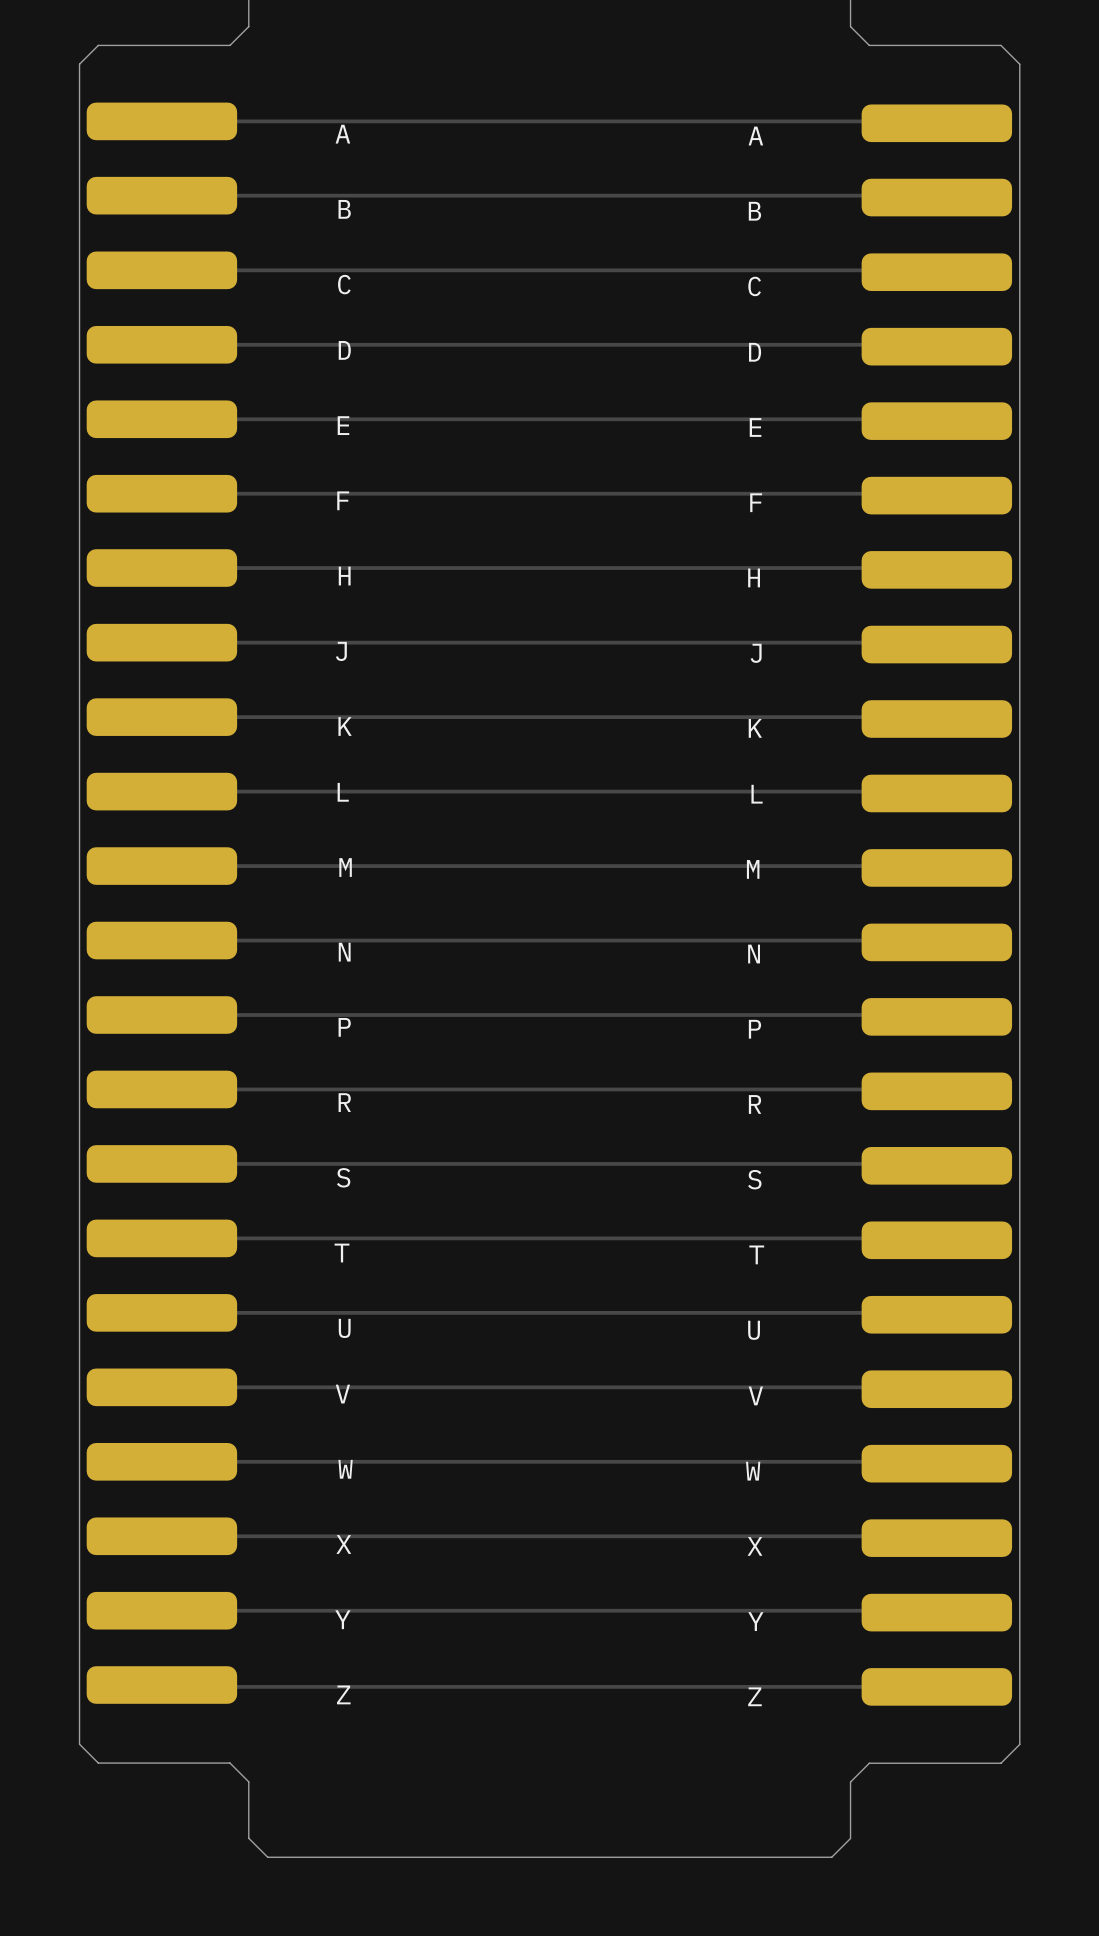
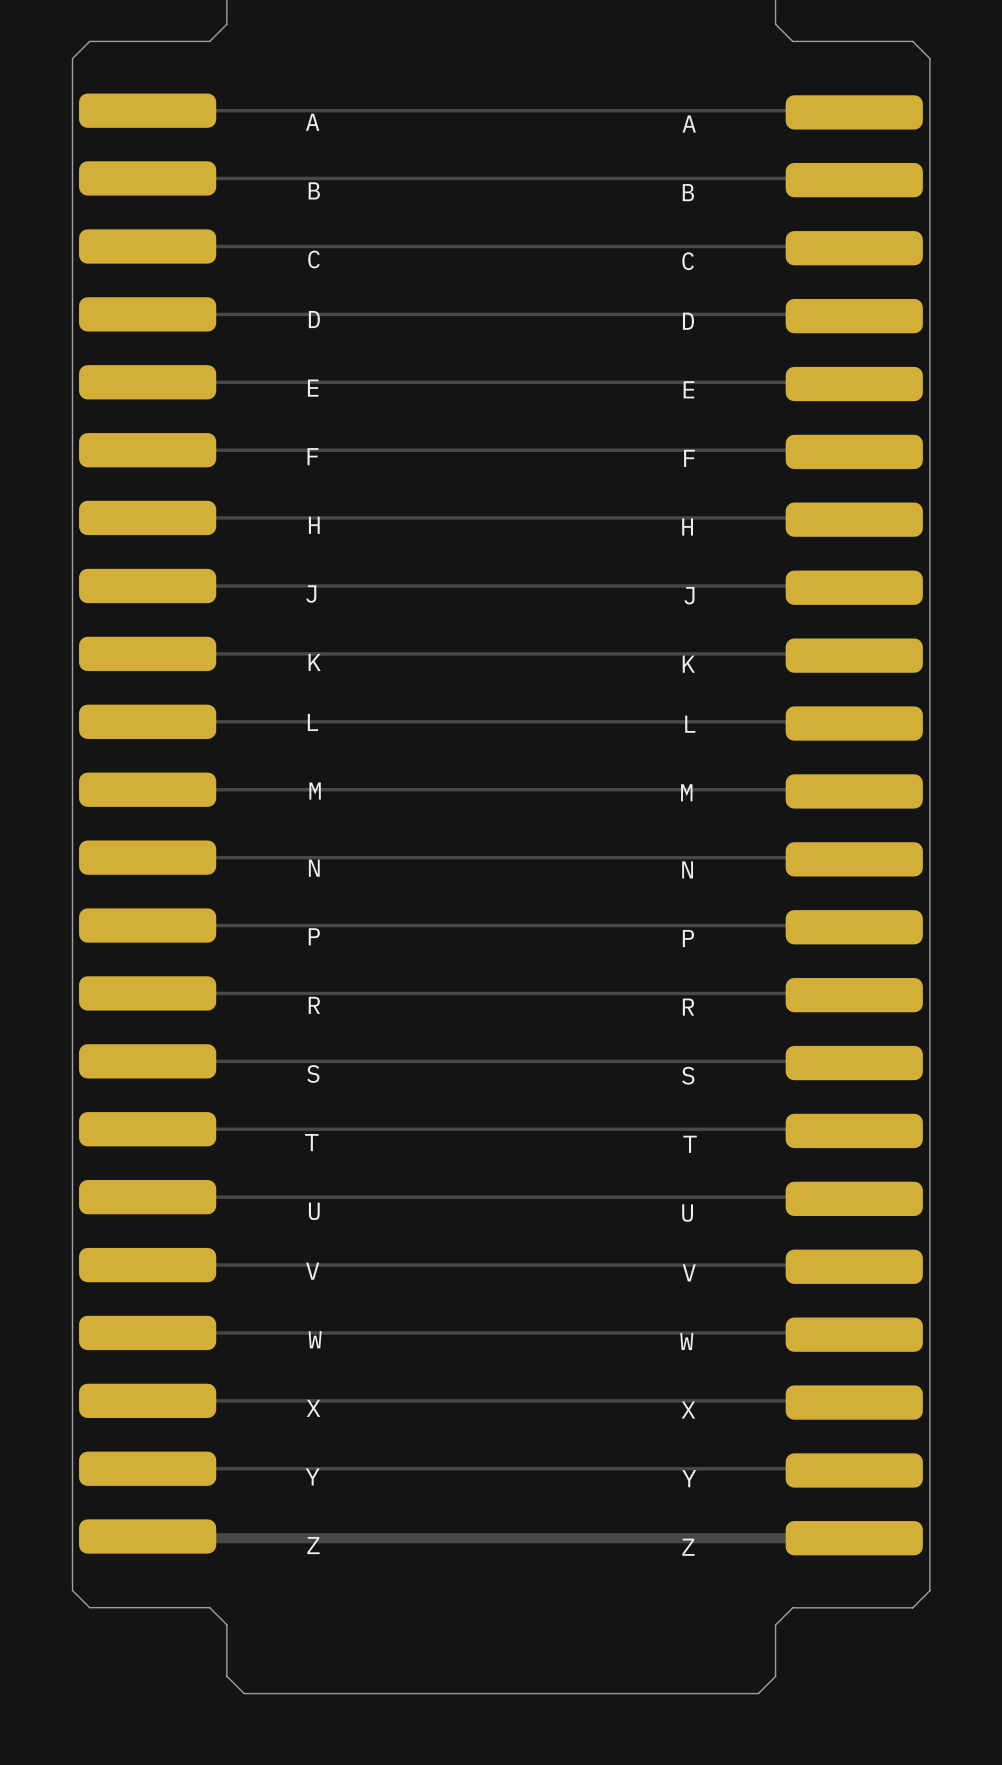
track width: thin (161, 1685) (163, 1686) (936, 1686) -> thick (147, 1536) (149, 1538) (854, 1538)

